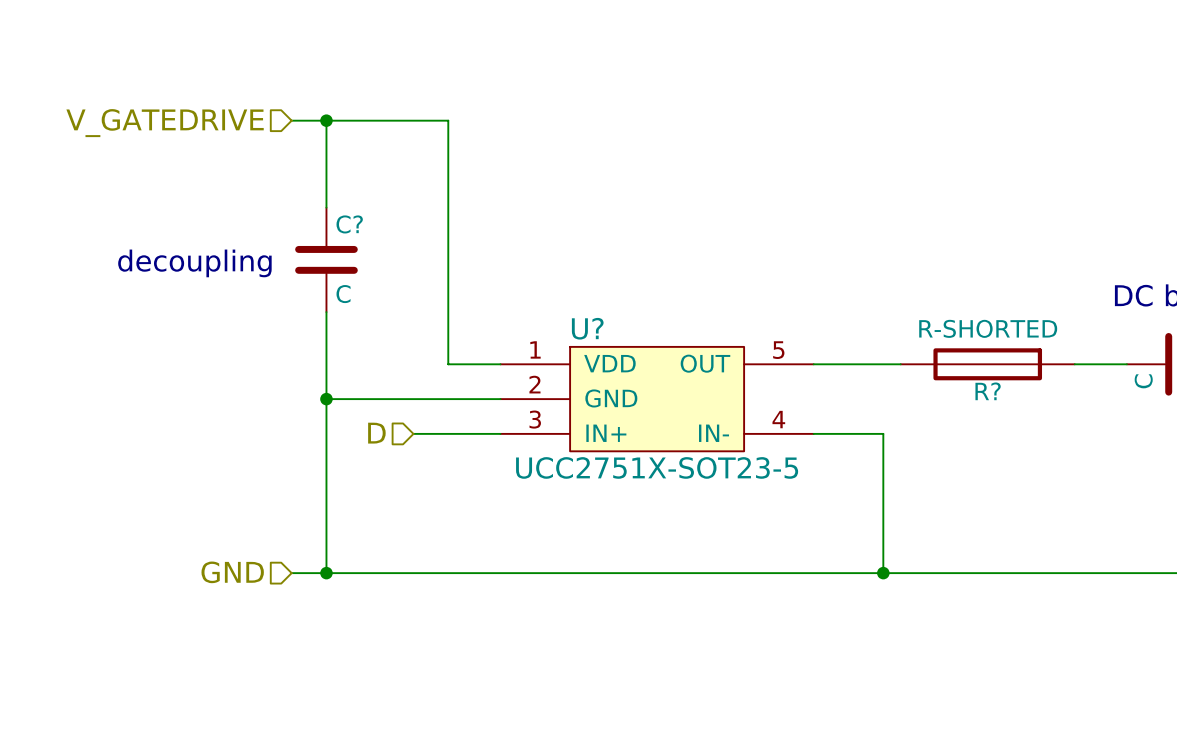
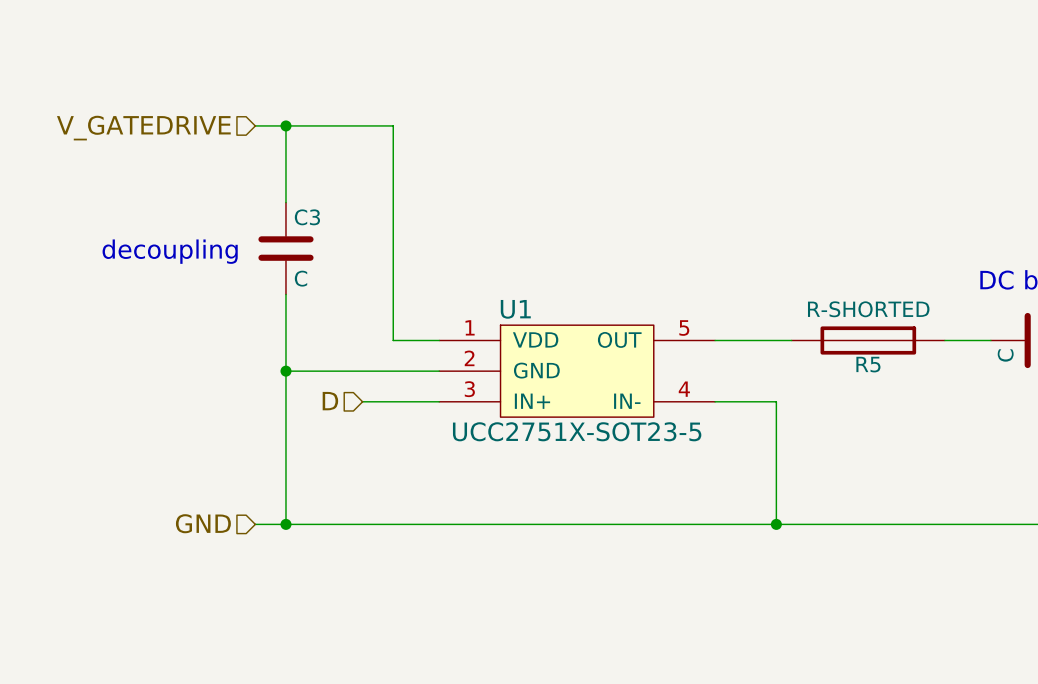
C? name: C? (349, 224) -> C3 (307, 217)
U? name: U? (587, 328) -> U1 (515, 309)
R? name: R? (988, 391) -> R5 (868, 364)

